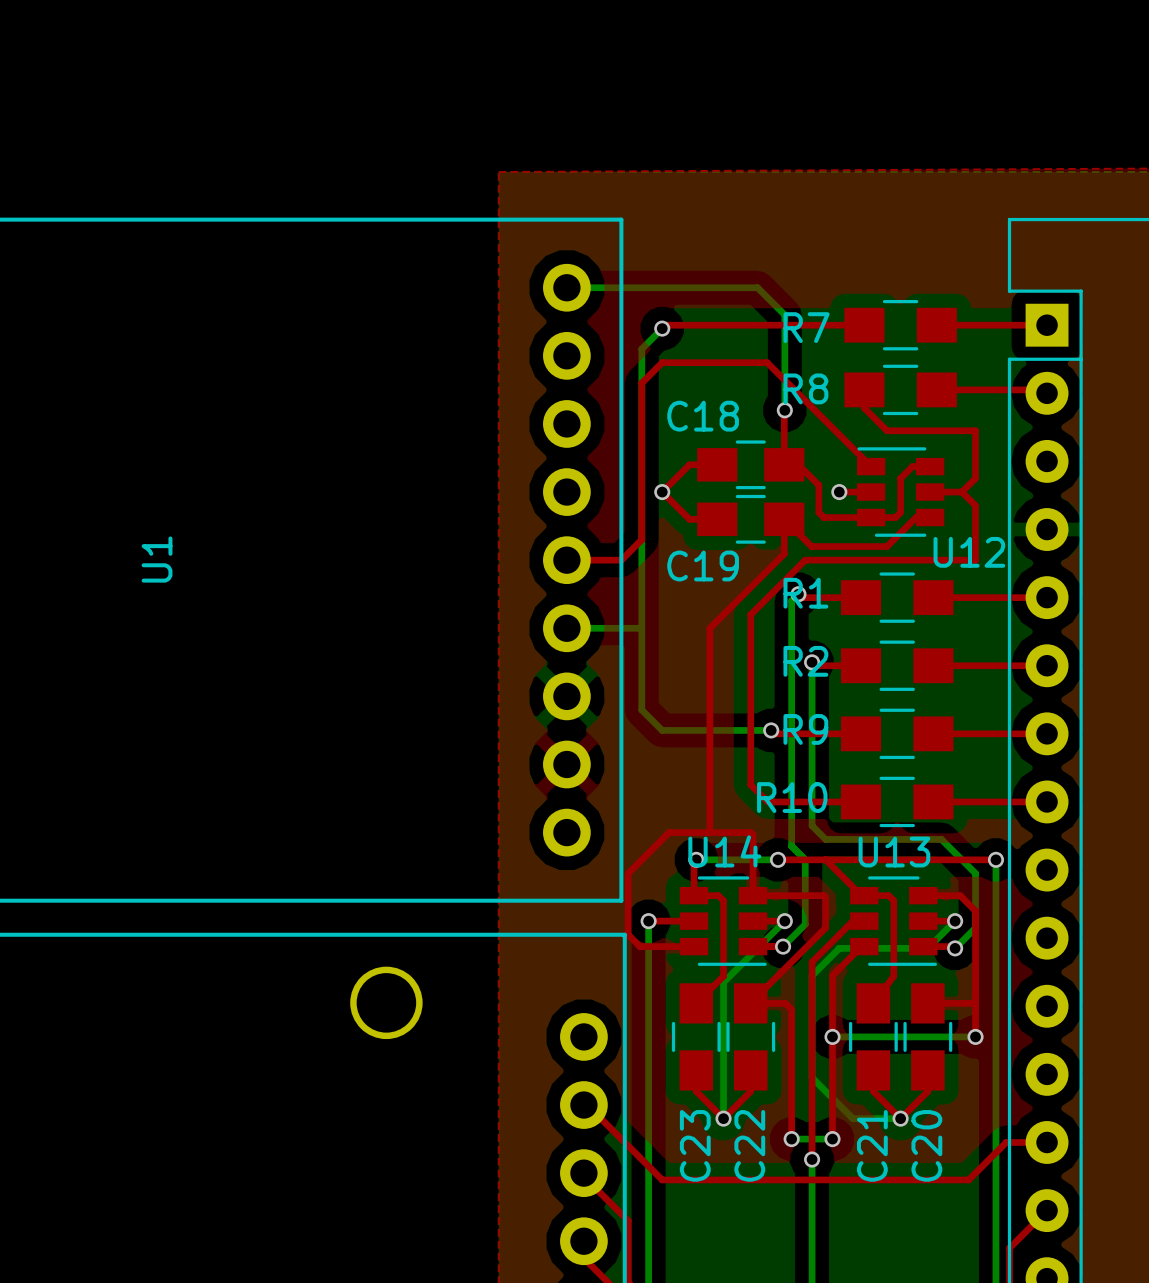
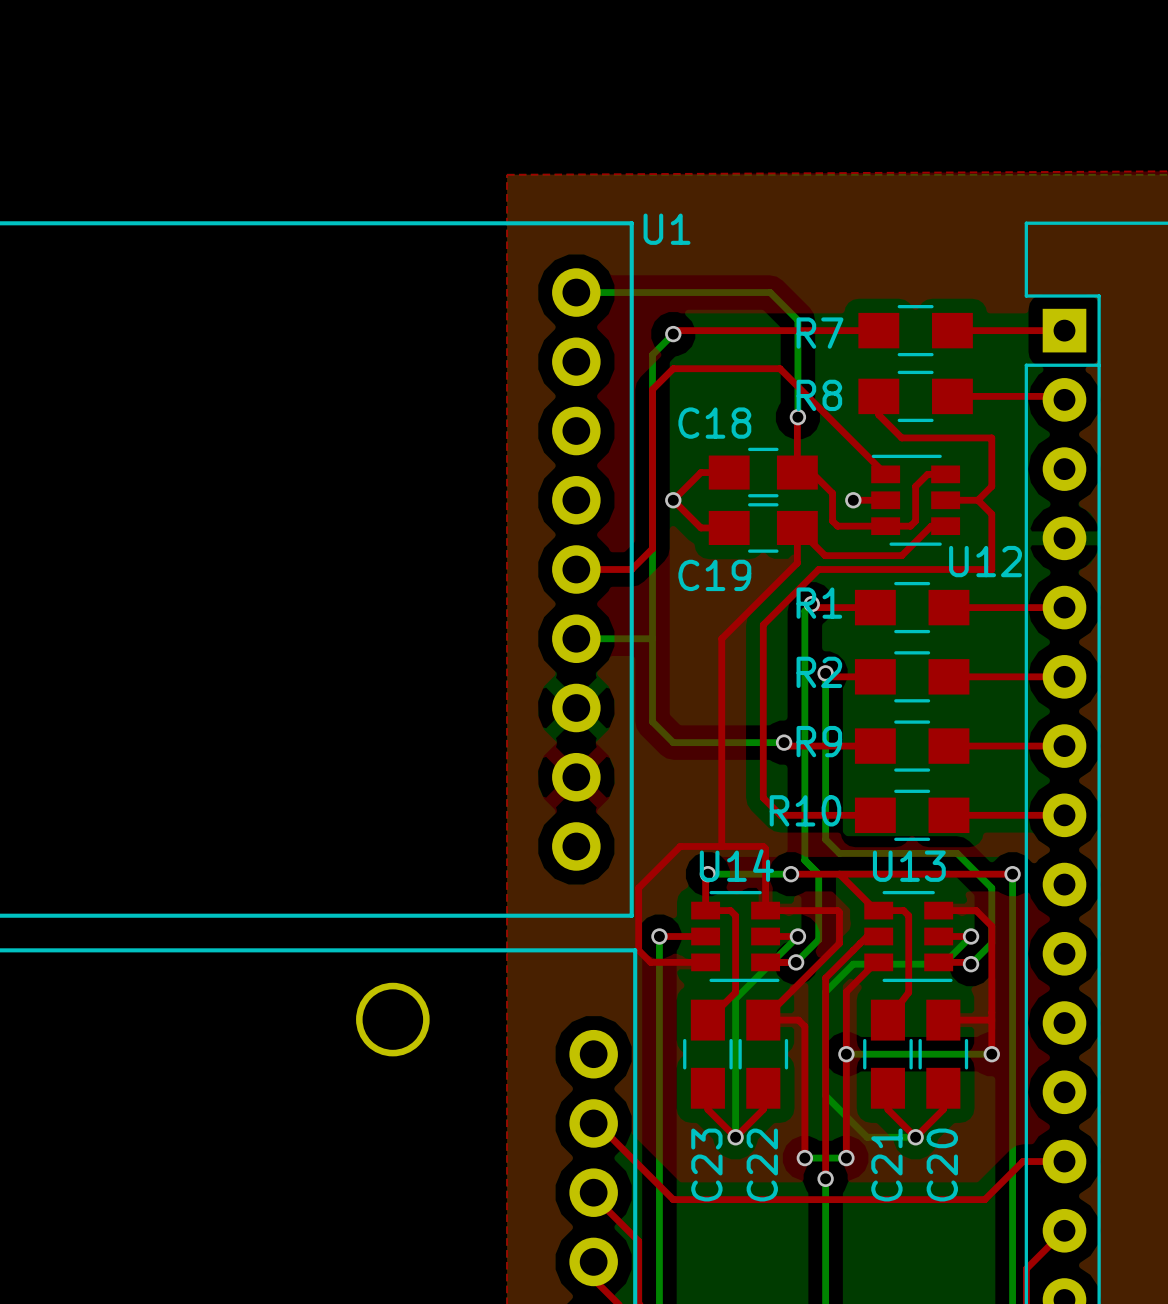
U1 name rotation: 0° (157, 559) -> 90° clockwise (667, 229)
U1 name position: U1 (157, 559) -> U1 (667, 229)

